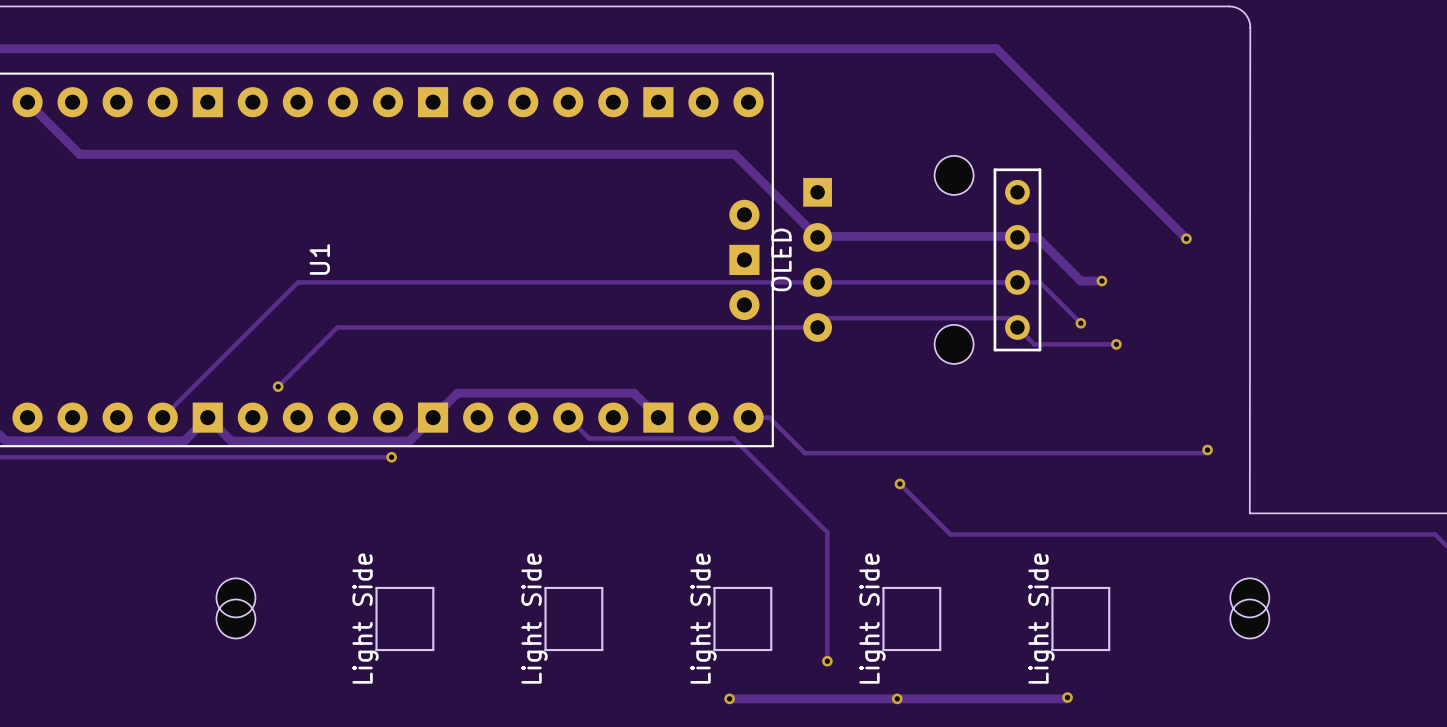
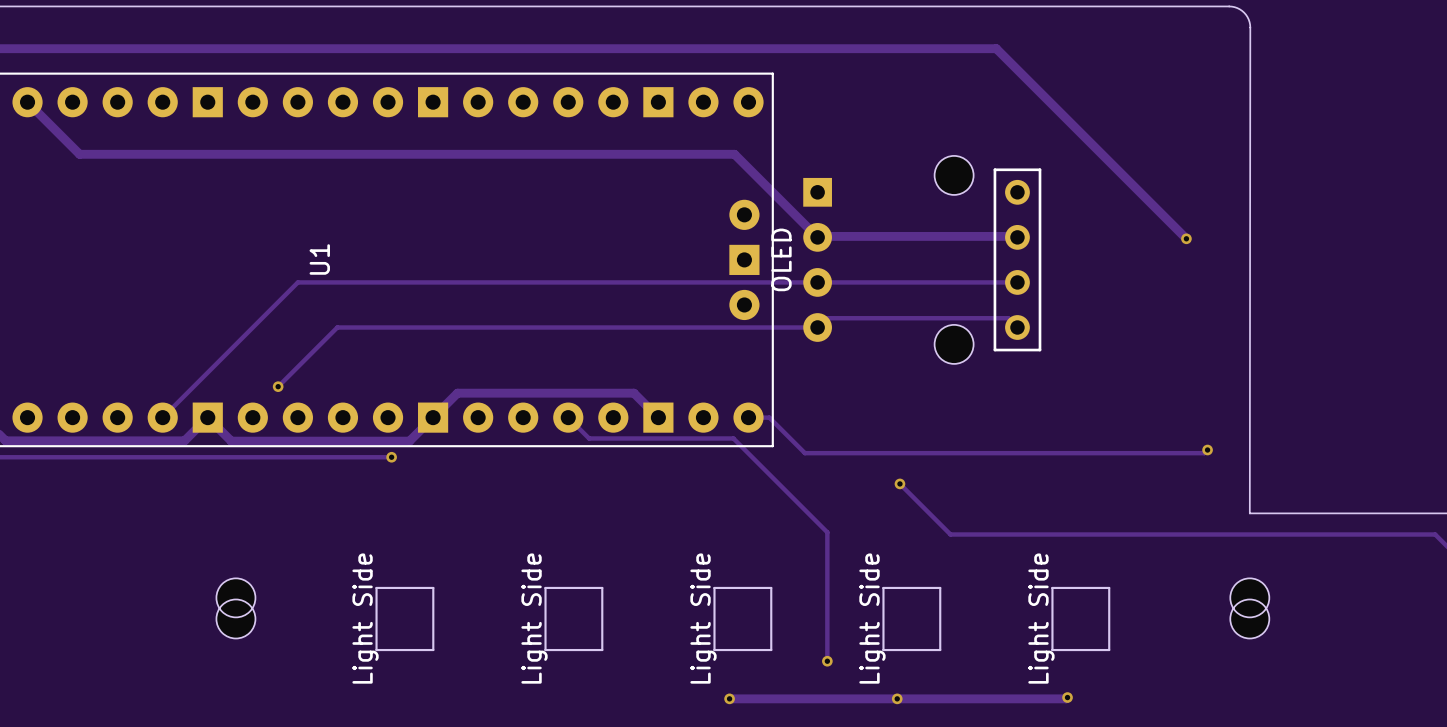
track: (1017, 237) (1037, 237) (1080, 281) (1101, 281) -> none
via: (1101, 281) -> none
track: (1017, 282) (1040, 282) (1080, 323) -> none
via: (1080, 323) -> none
track: (1017, 327) (1034, 344) (1116, 344) -> none
via: (1116, 344) -> none

